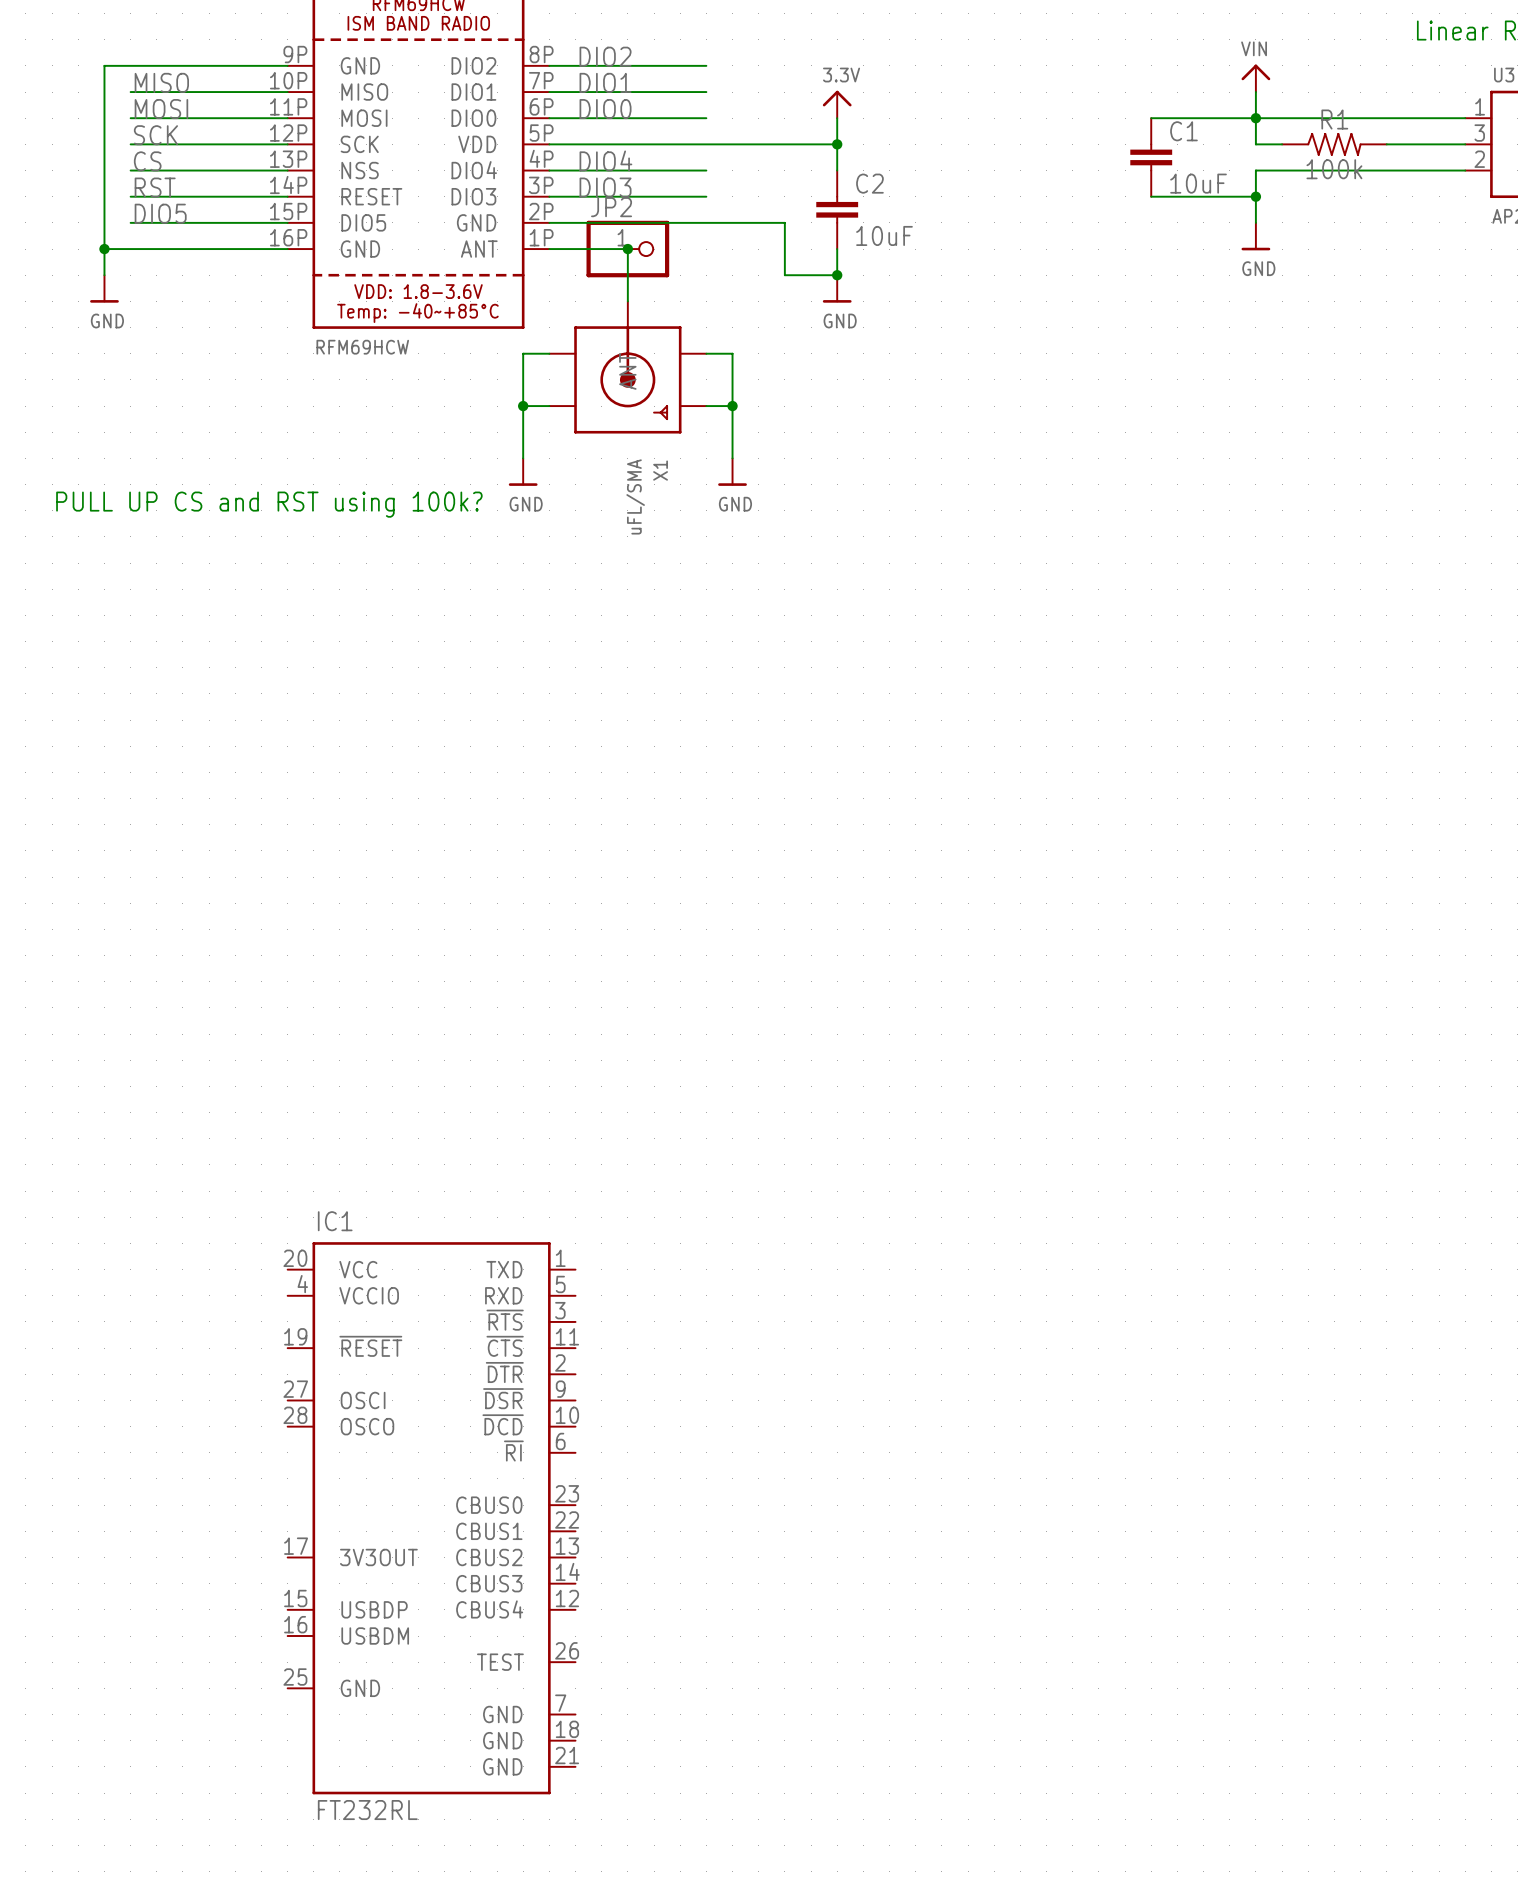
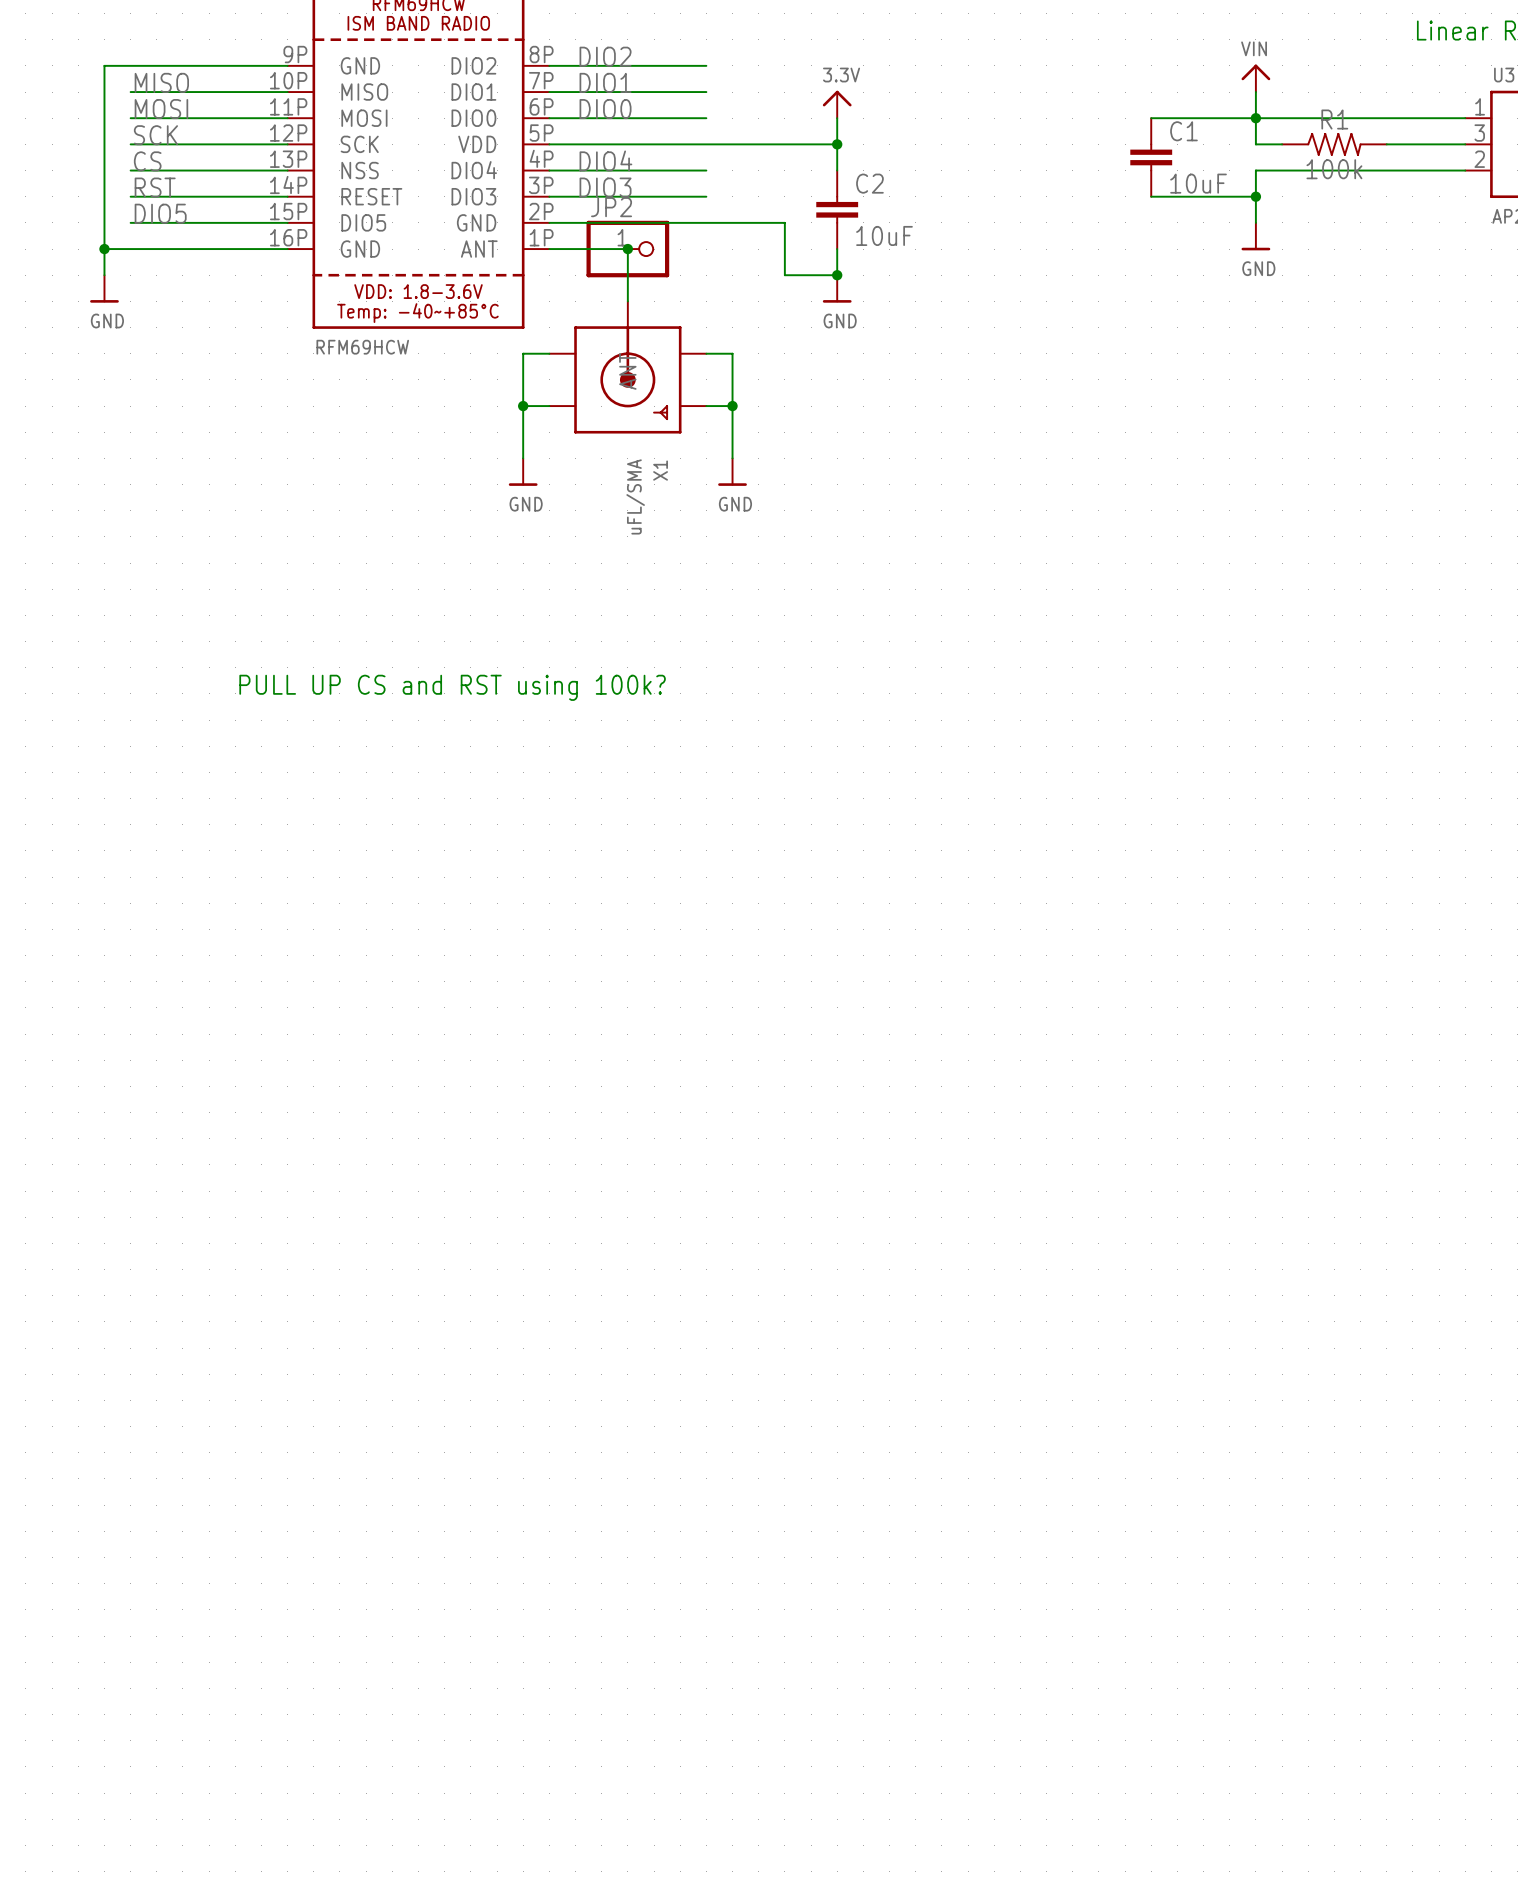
text: PULL UP CS and RST using 100k? (269, 504) -> none
text: none -> PULL UP CS and RST using 100k? (452, 687)
IC1: FT232RL (431, 1518) -> none

